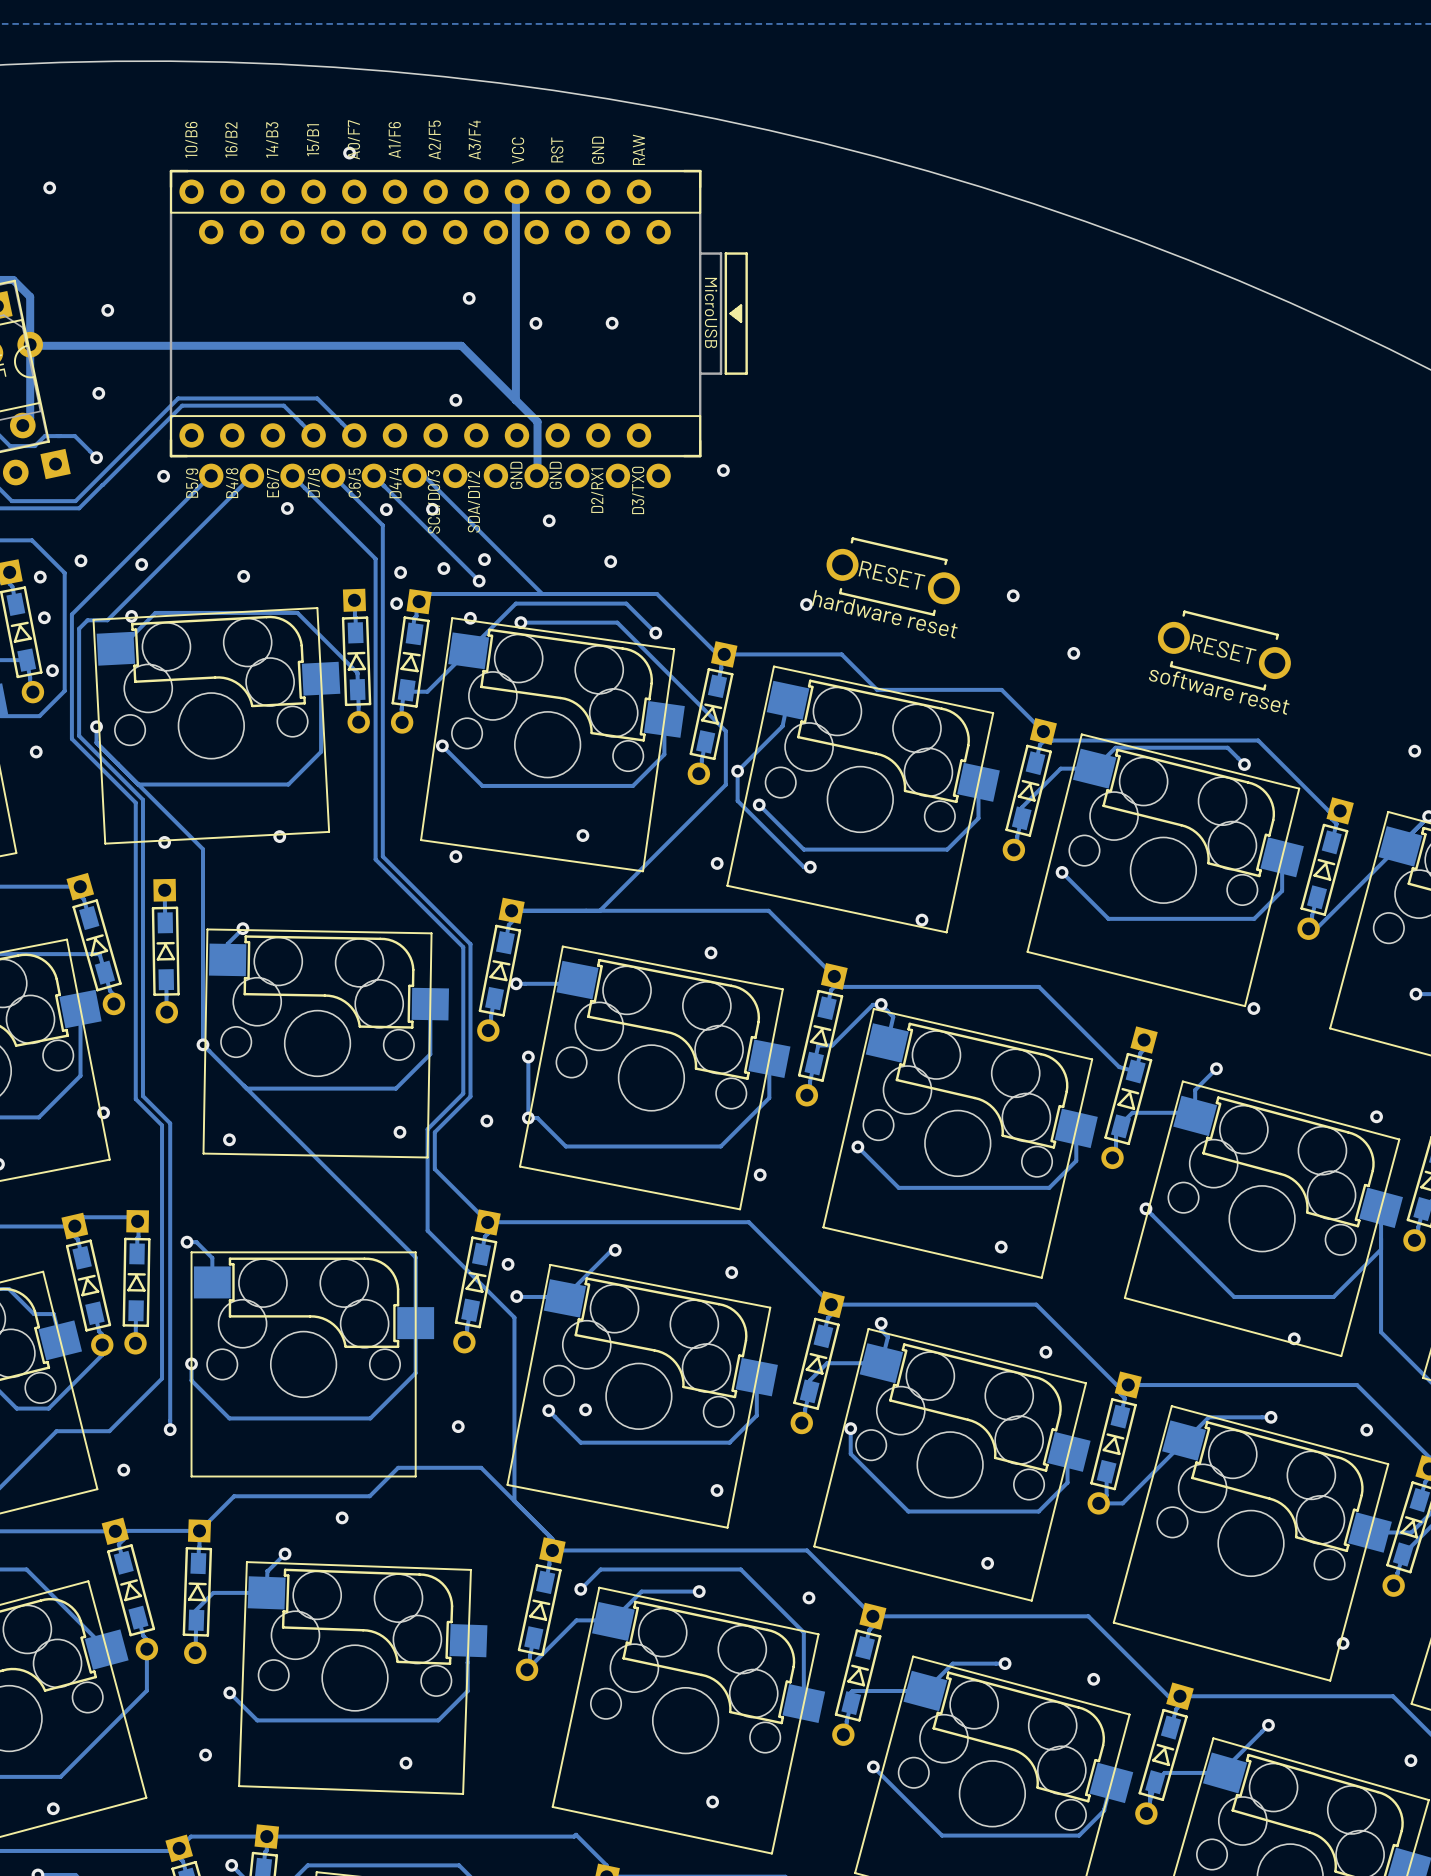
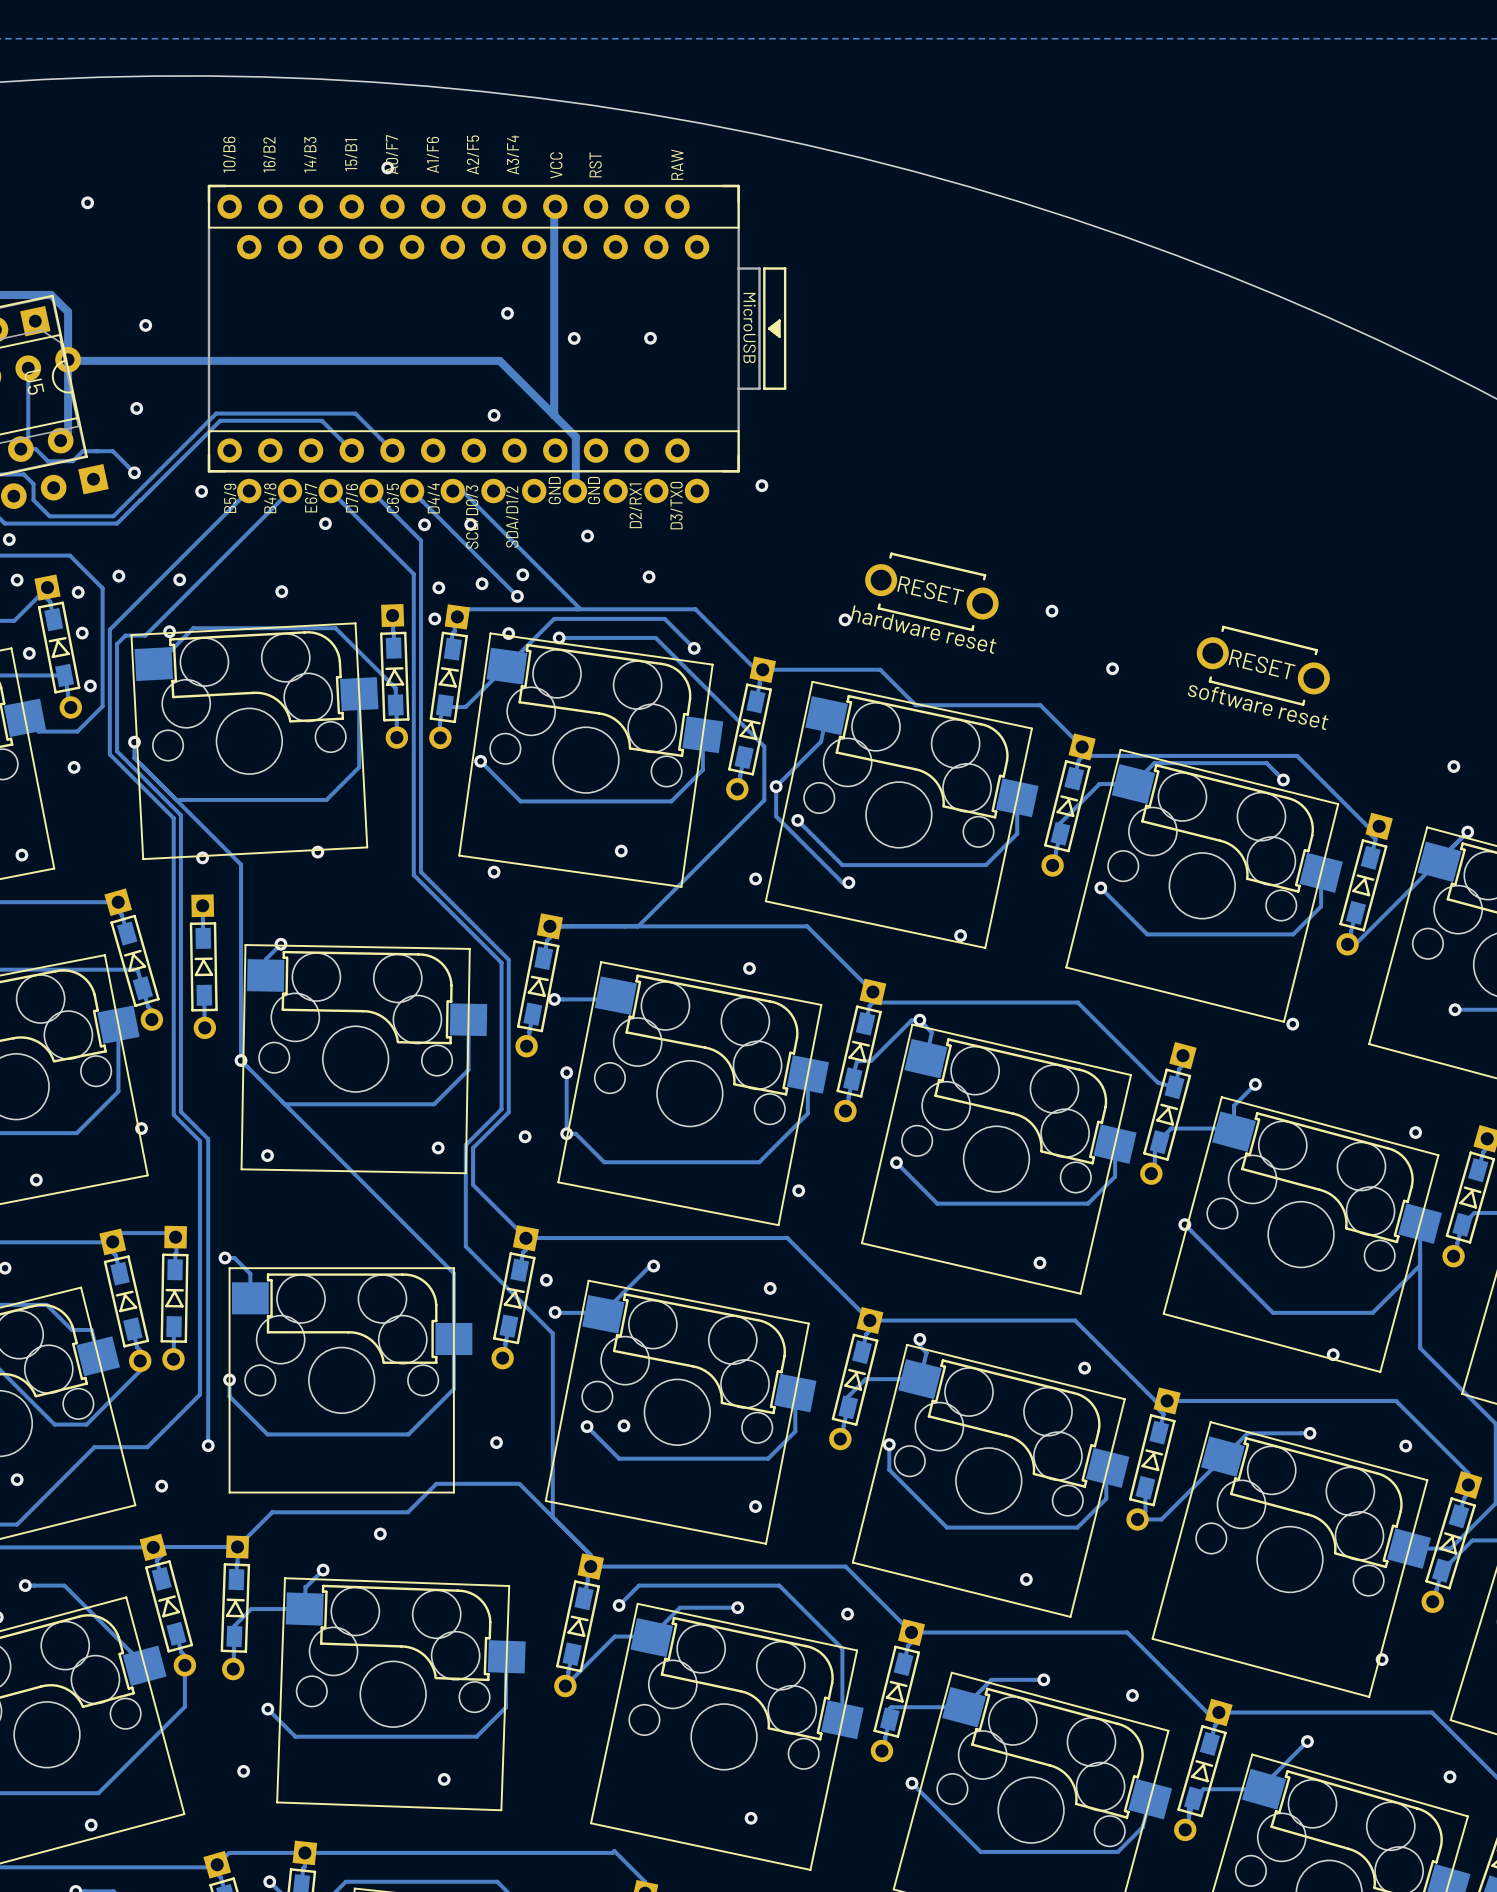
part text: GND (598, 150) -> none

